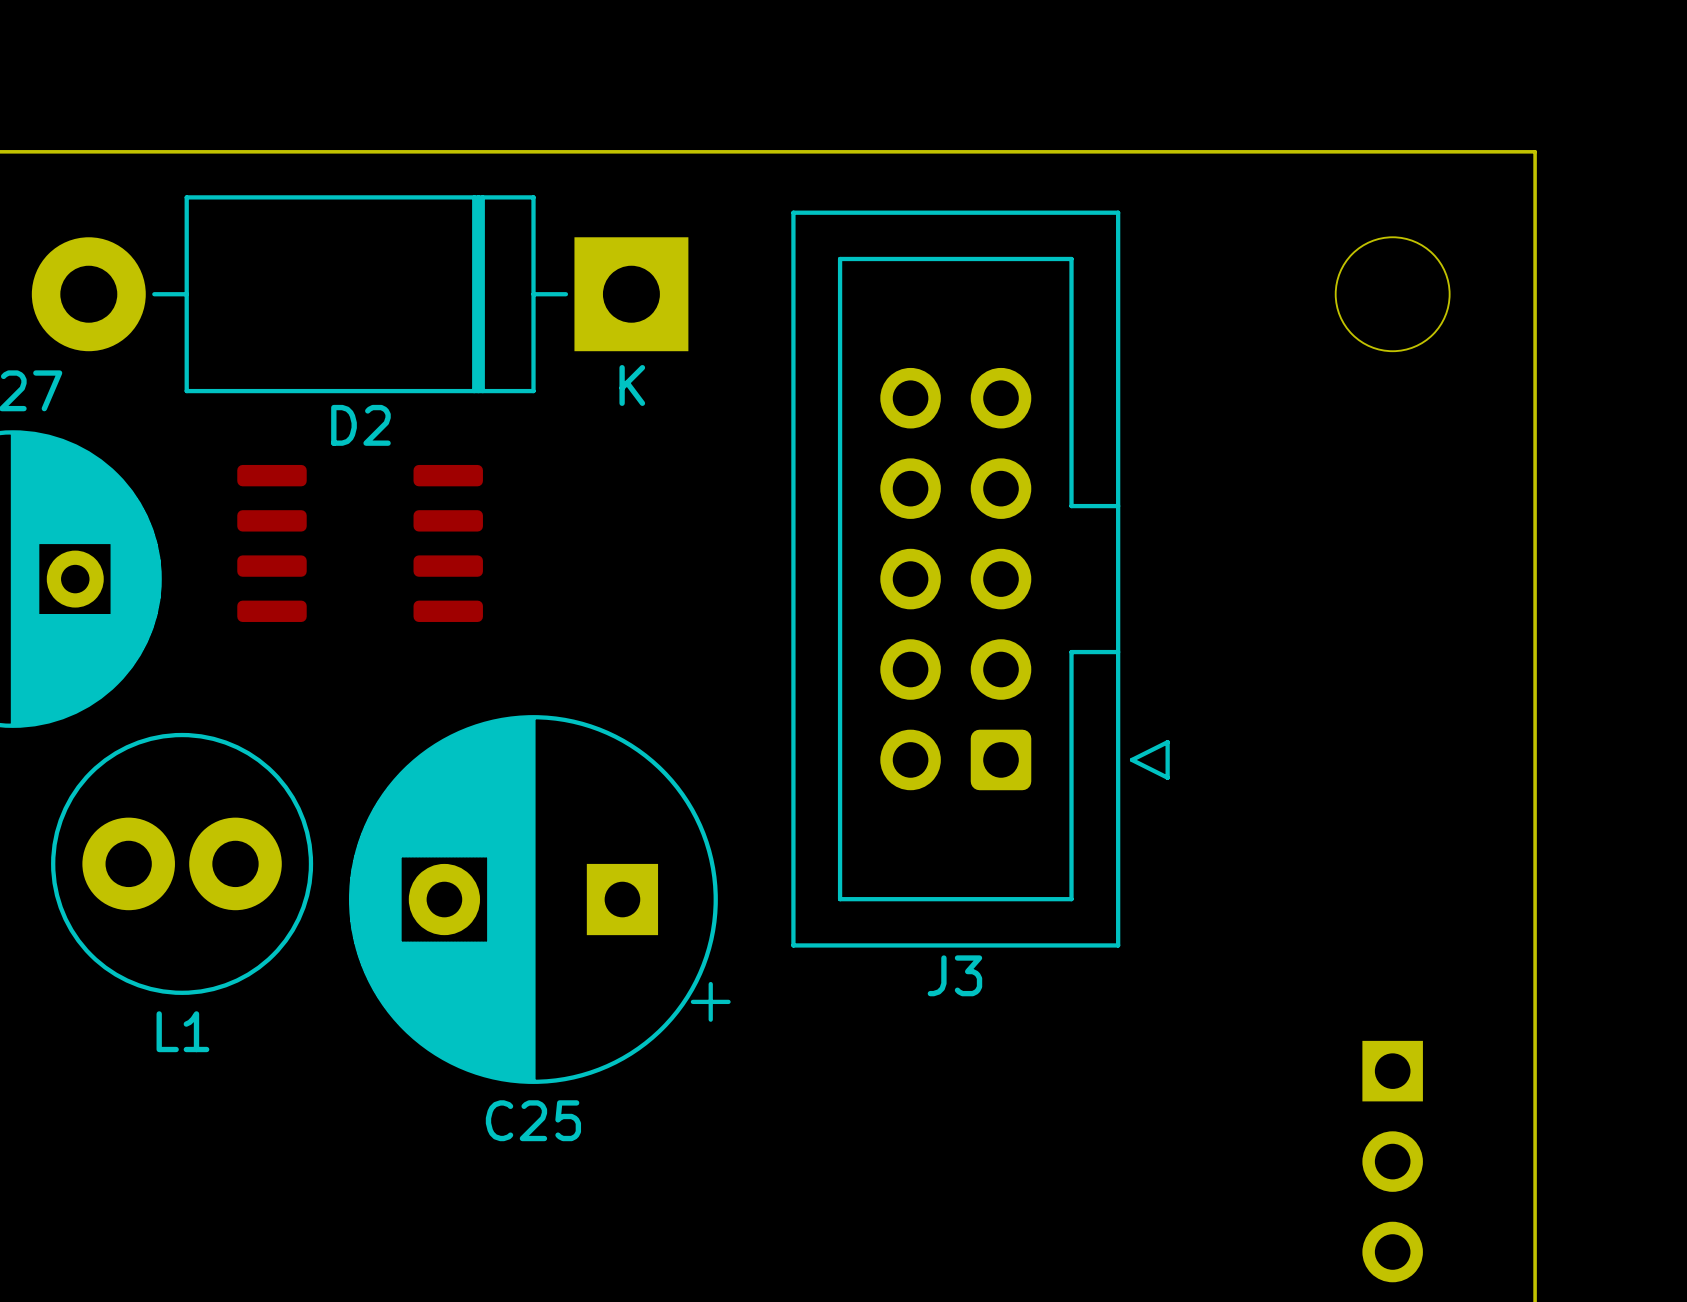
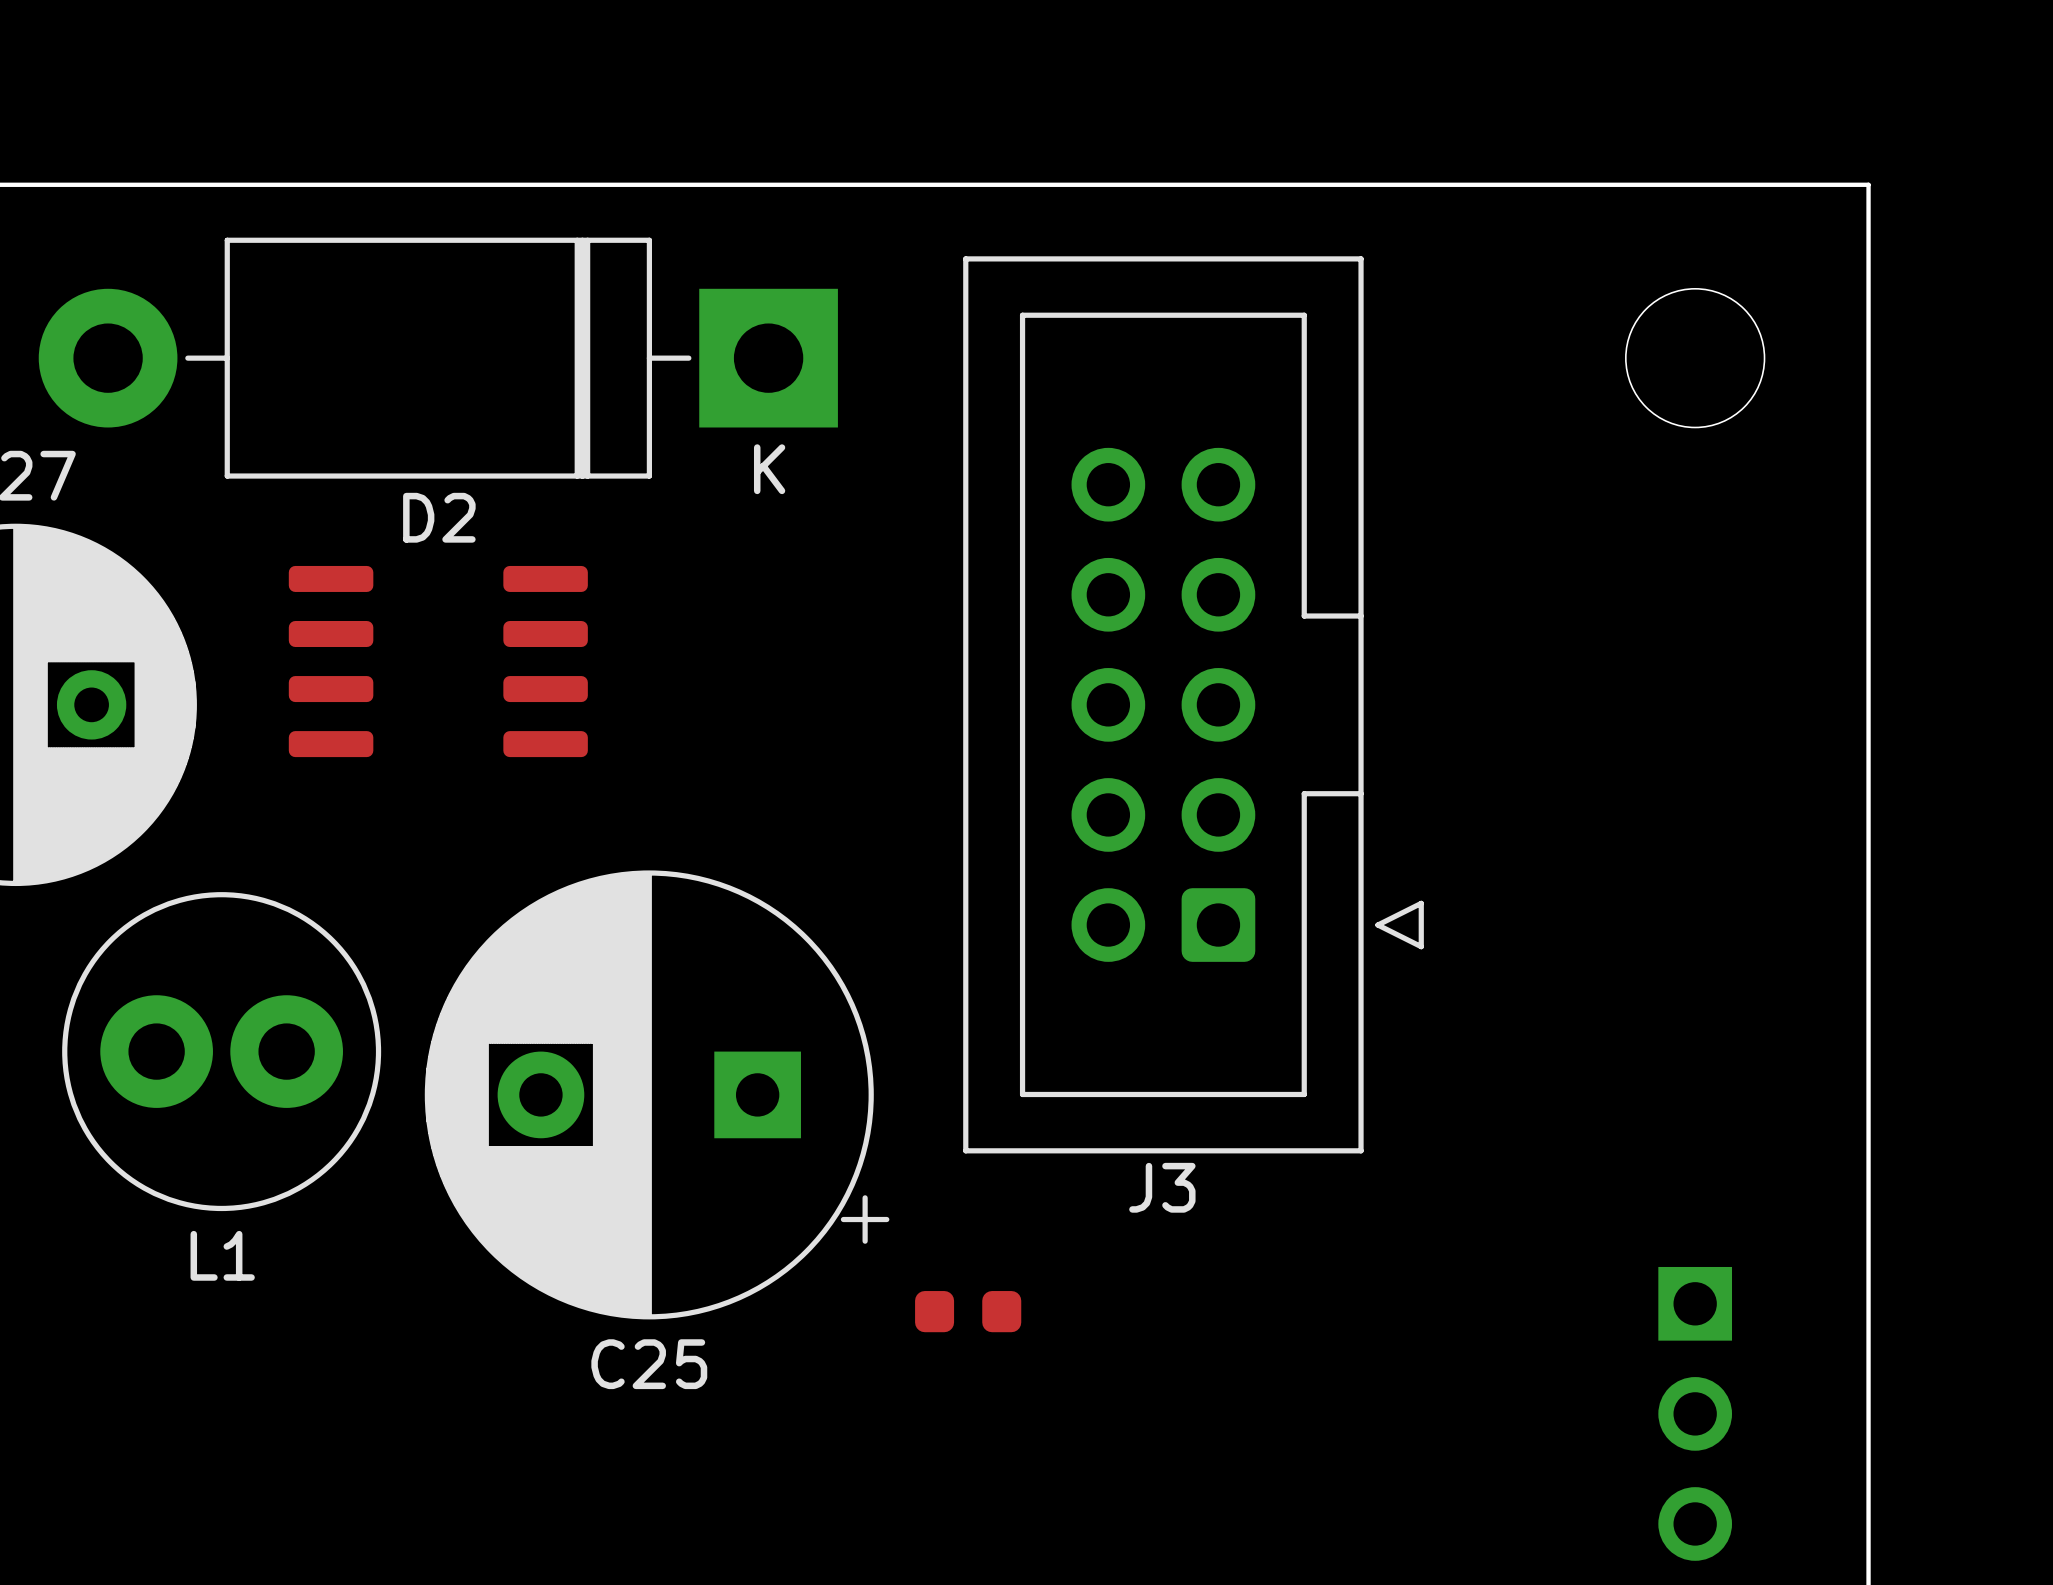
part: none -> (968, 1311)

